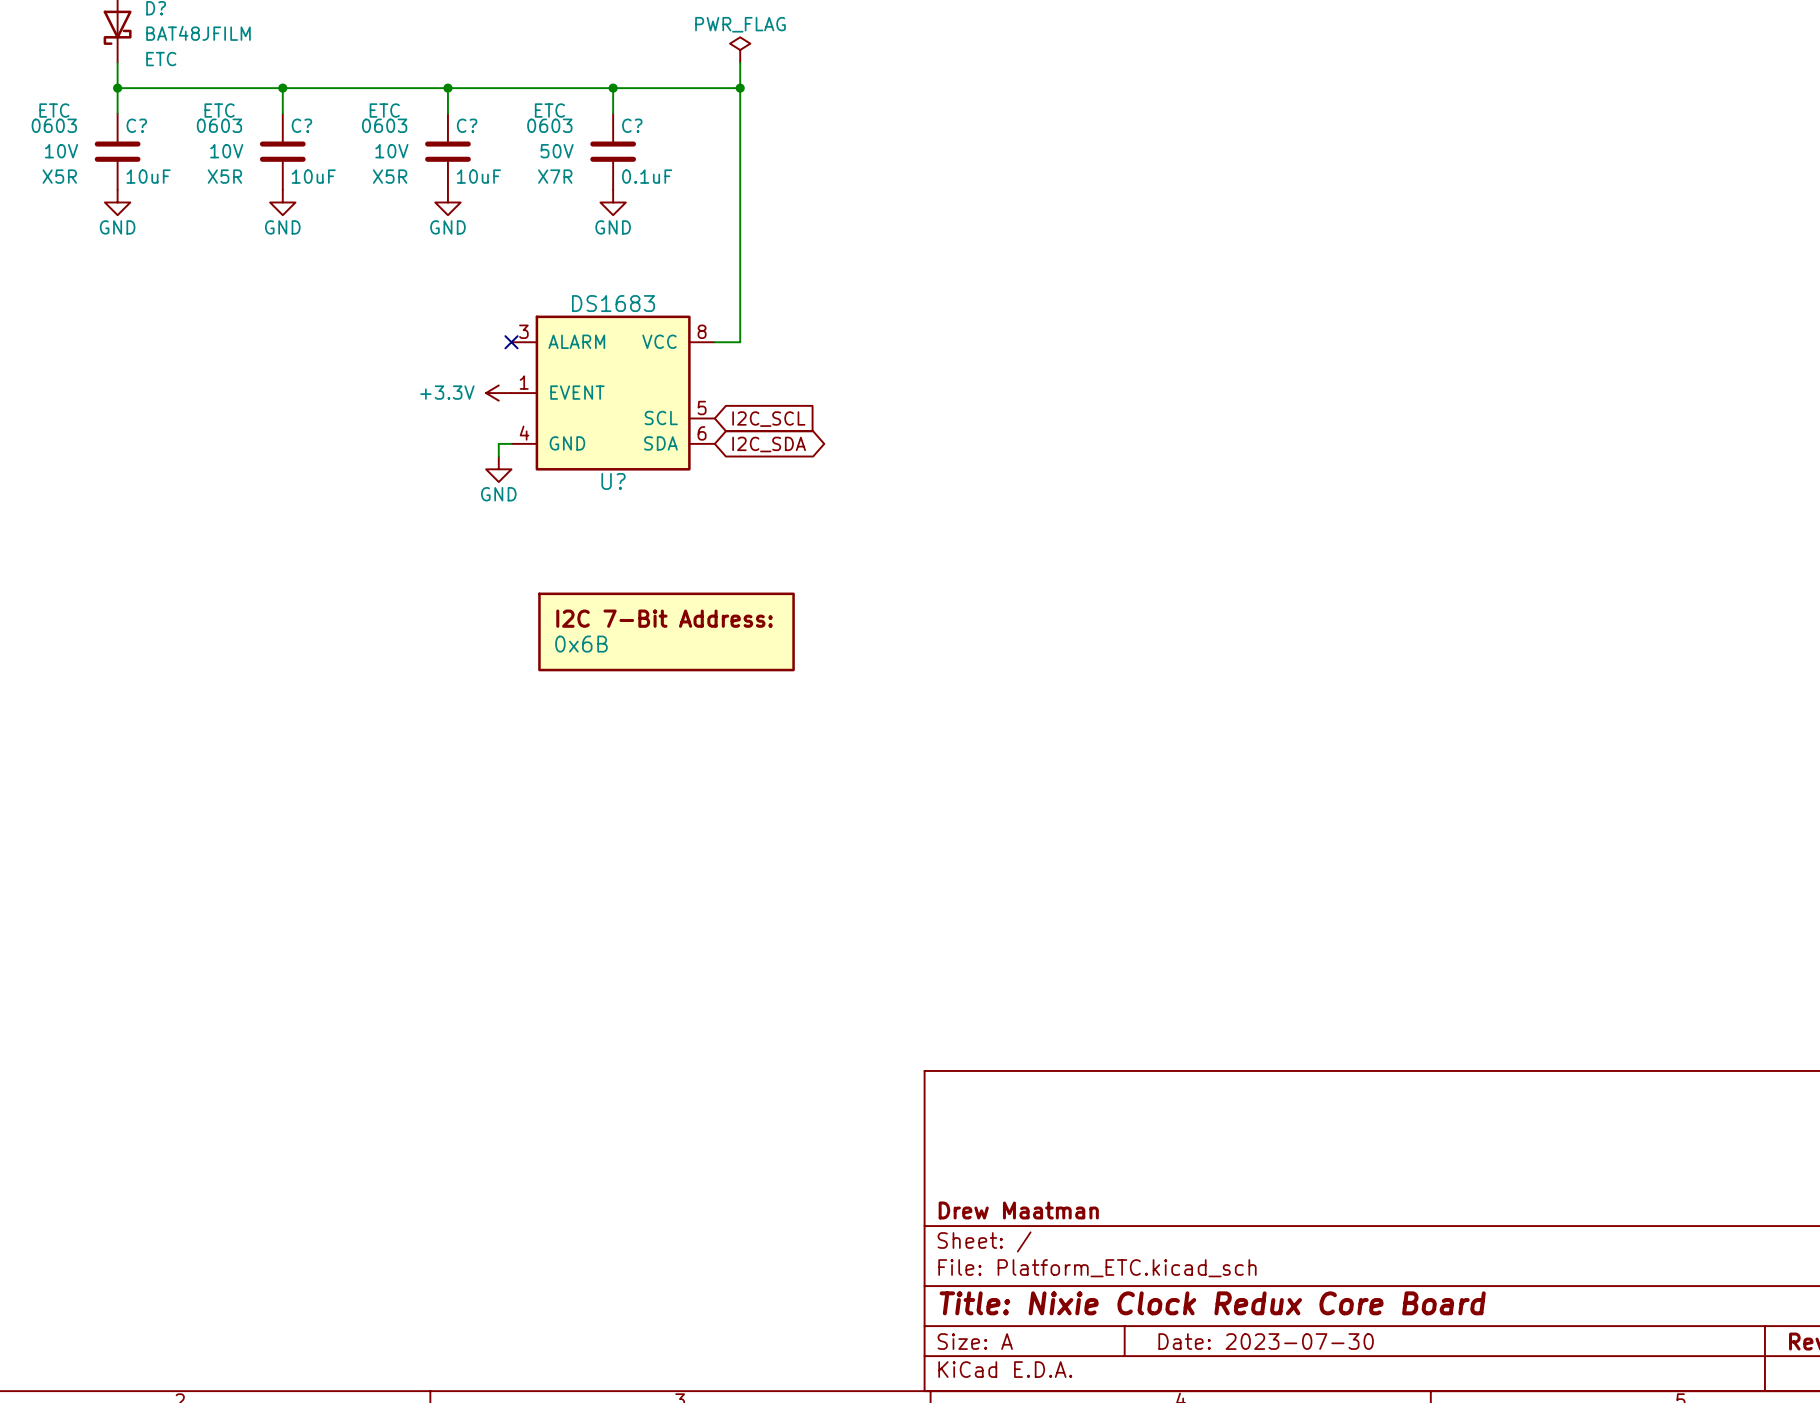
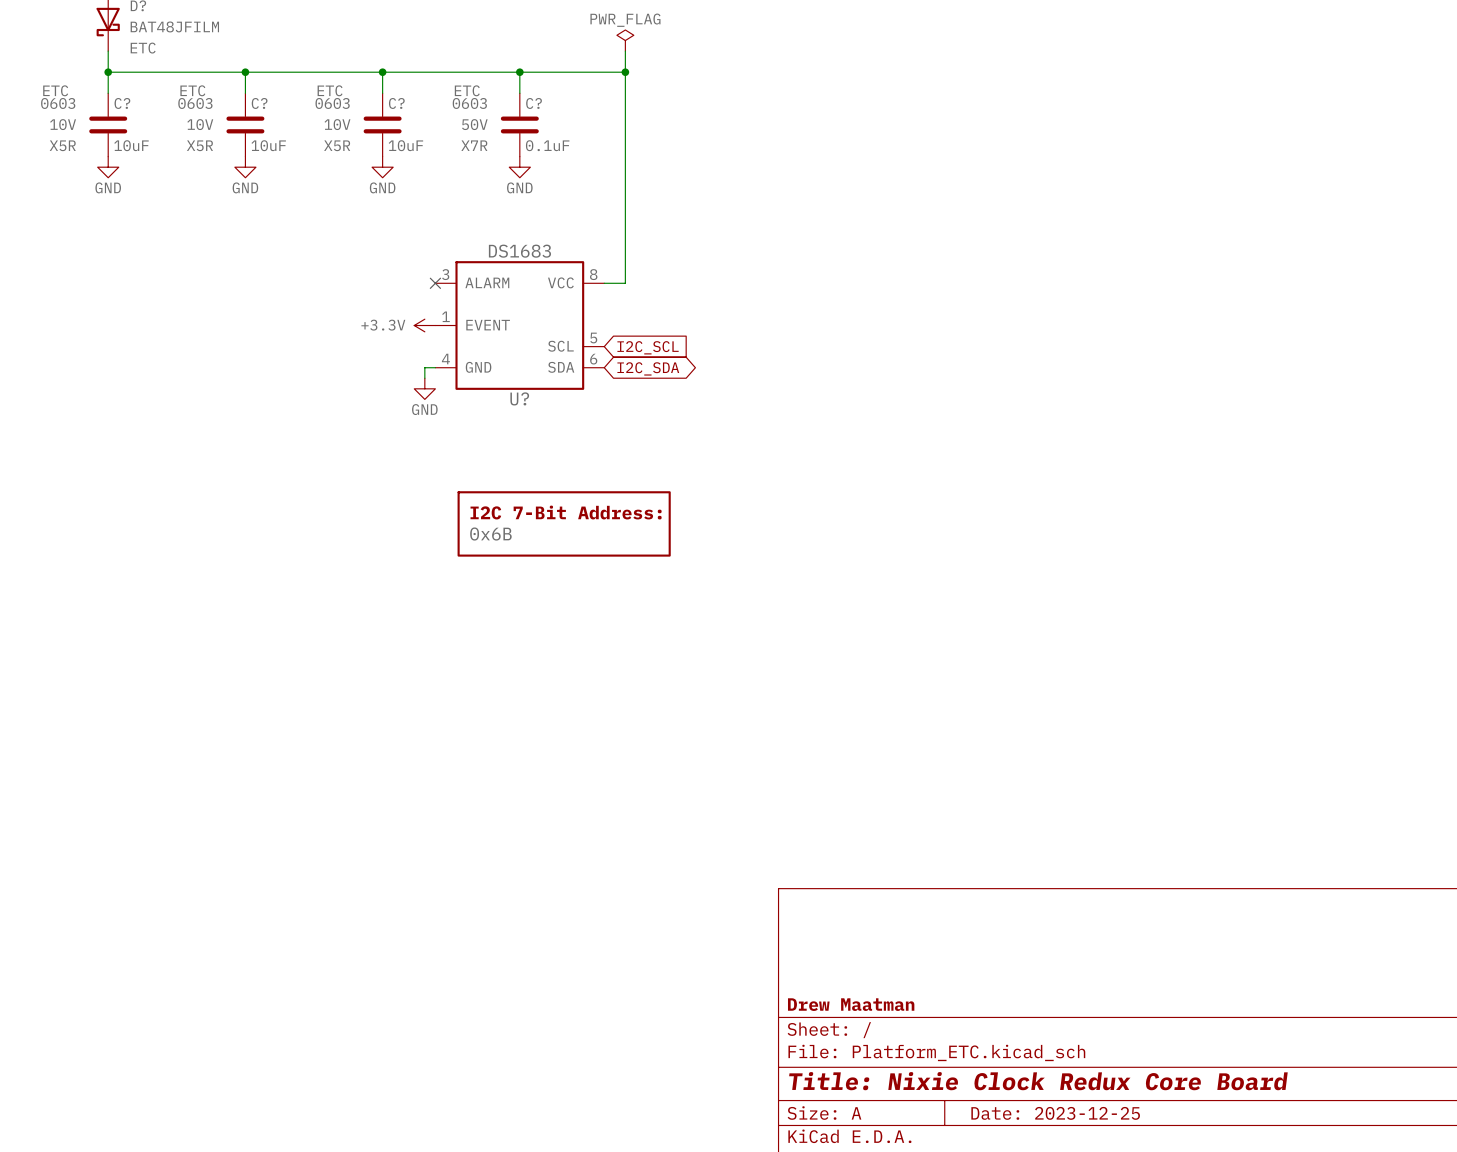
title block: Date: 2023-07-30 (1266, 1341) -> Date: 2023-12-25 (1055, 1113)

